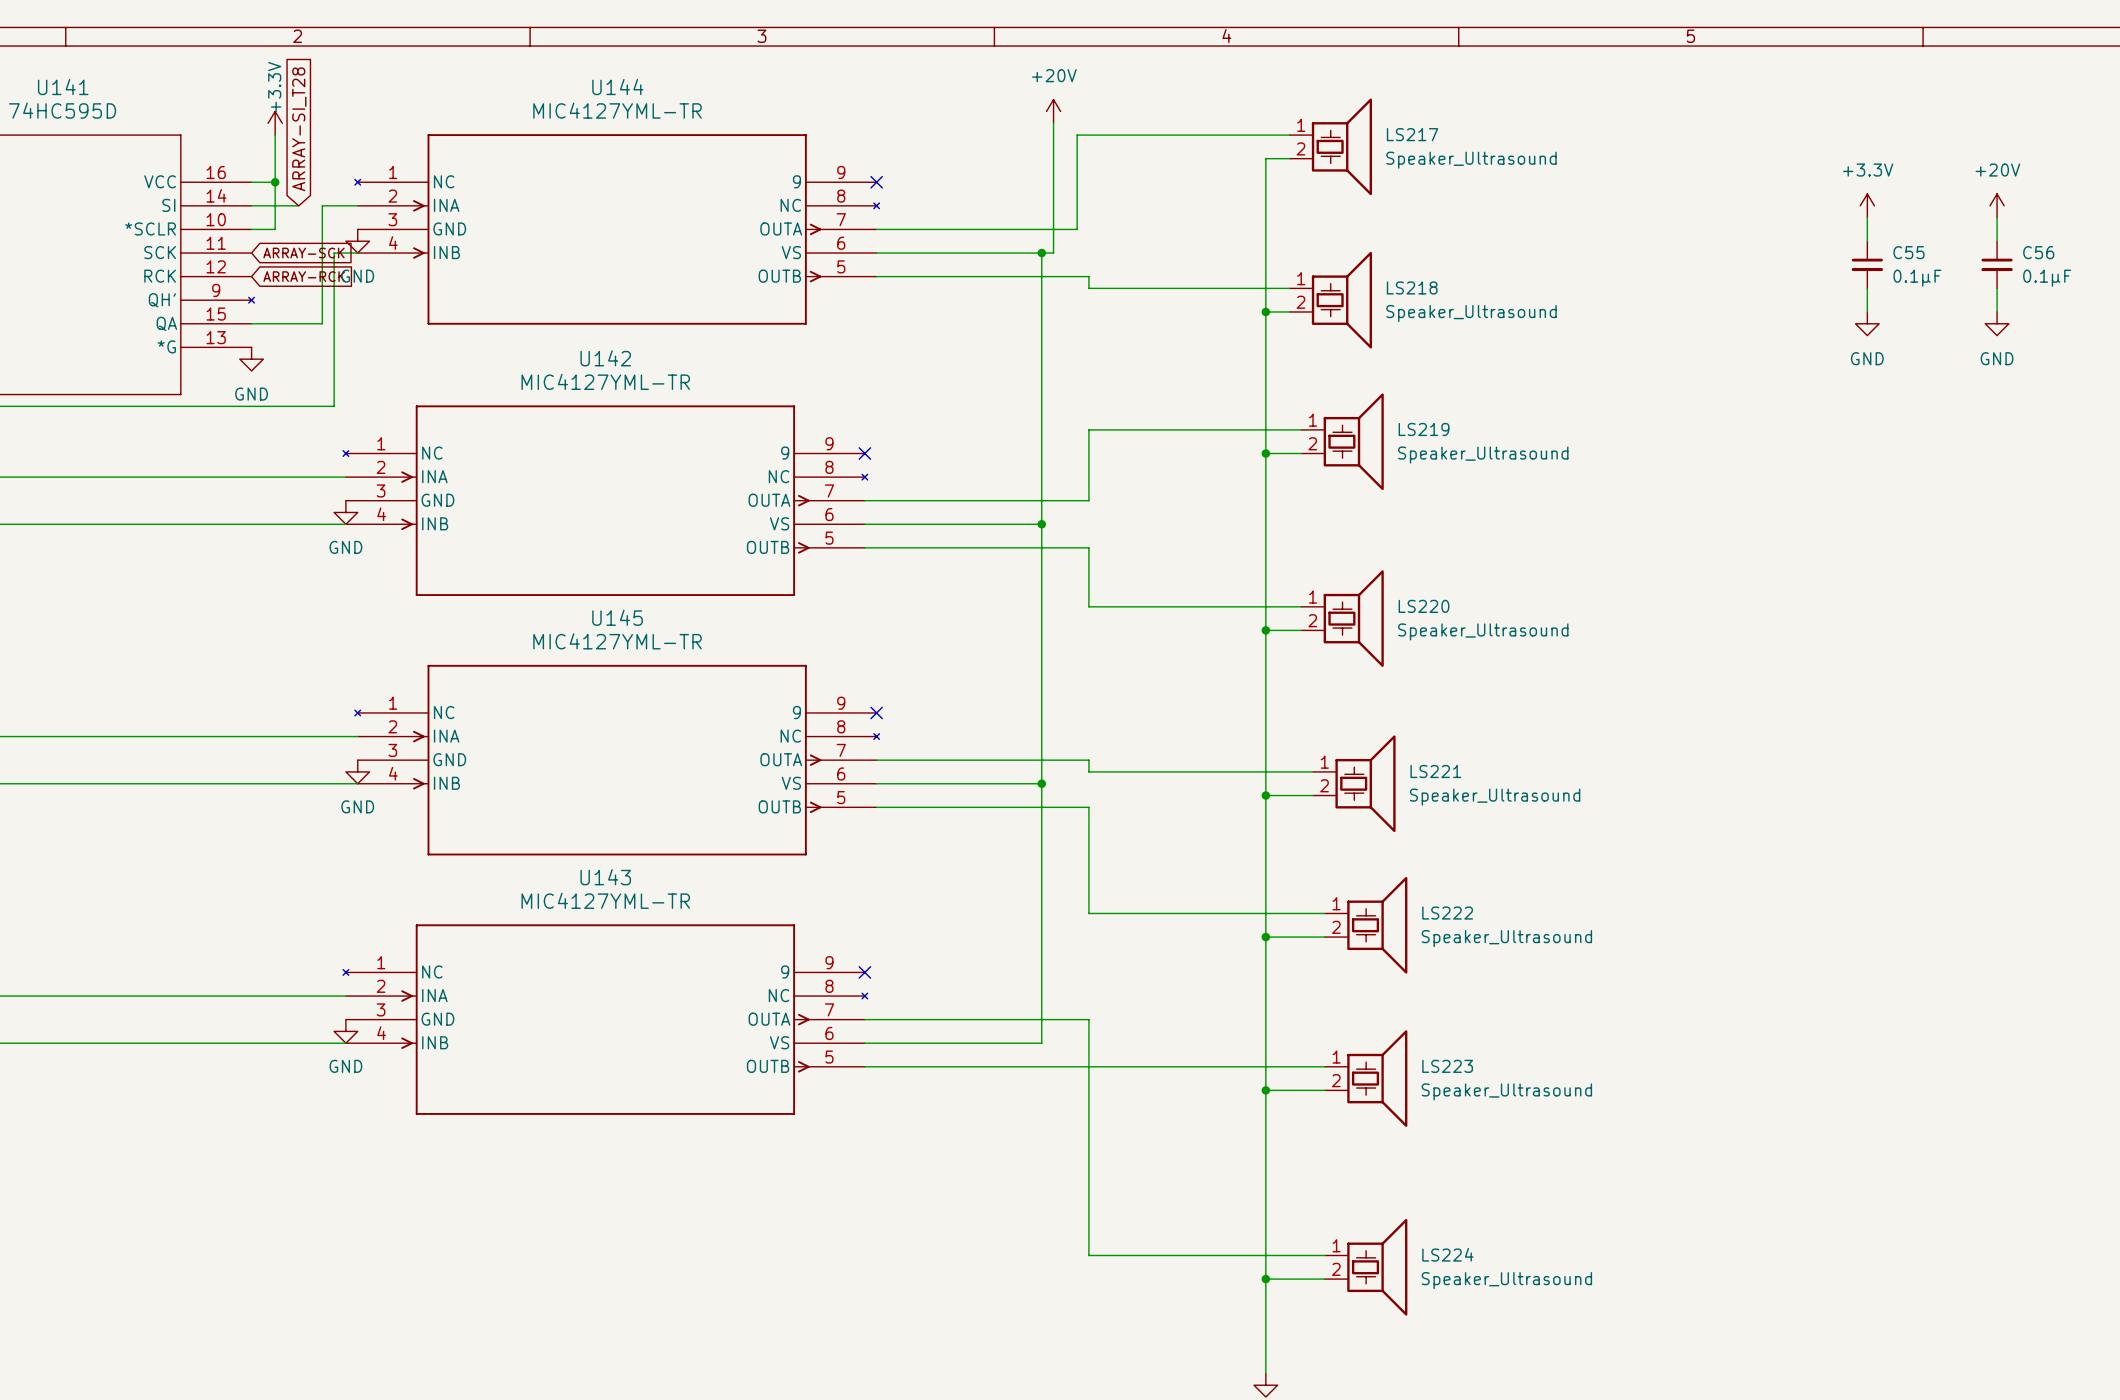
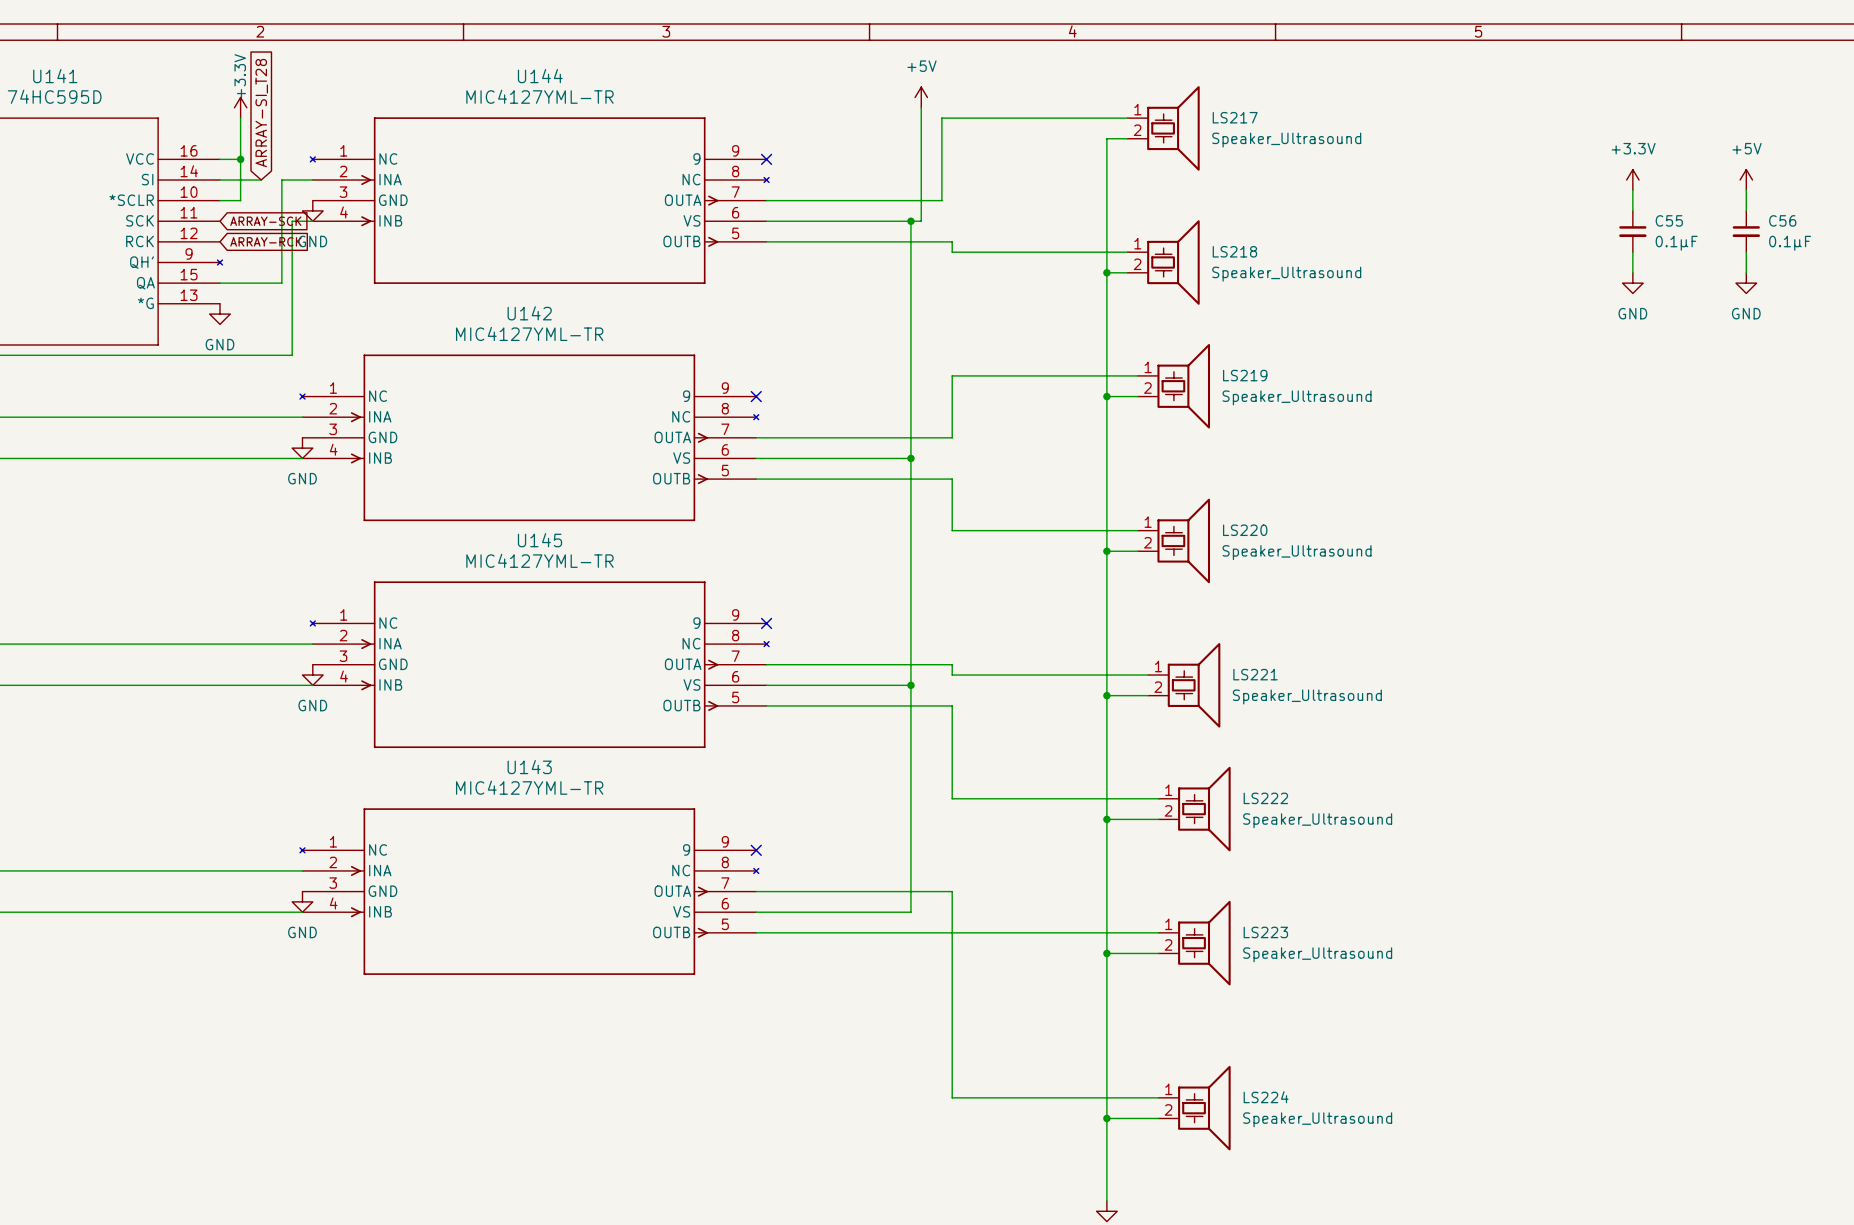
power symbol: +20V (1053, 111) -> +5V (921, 97)
power symbol: +20V (1997, 205) -> +5V (1746, 179)

